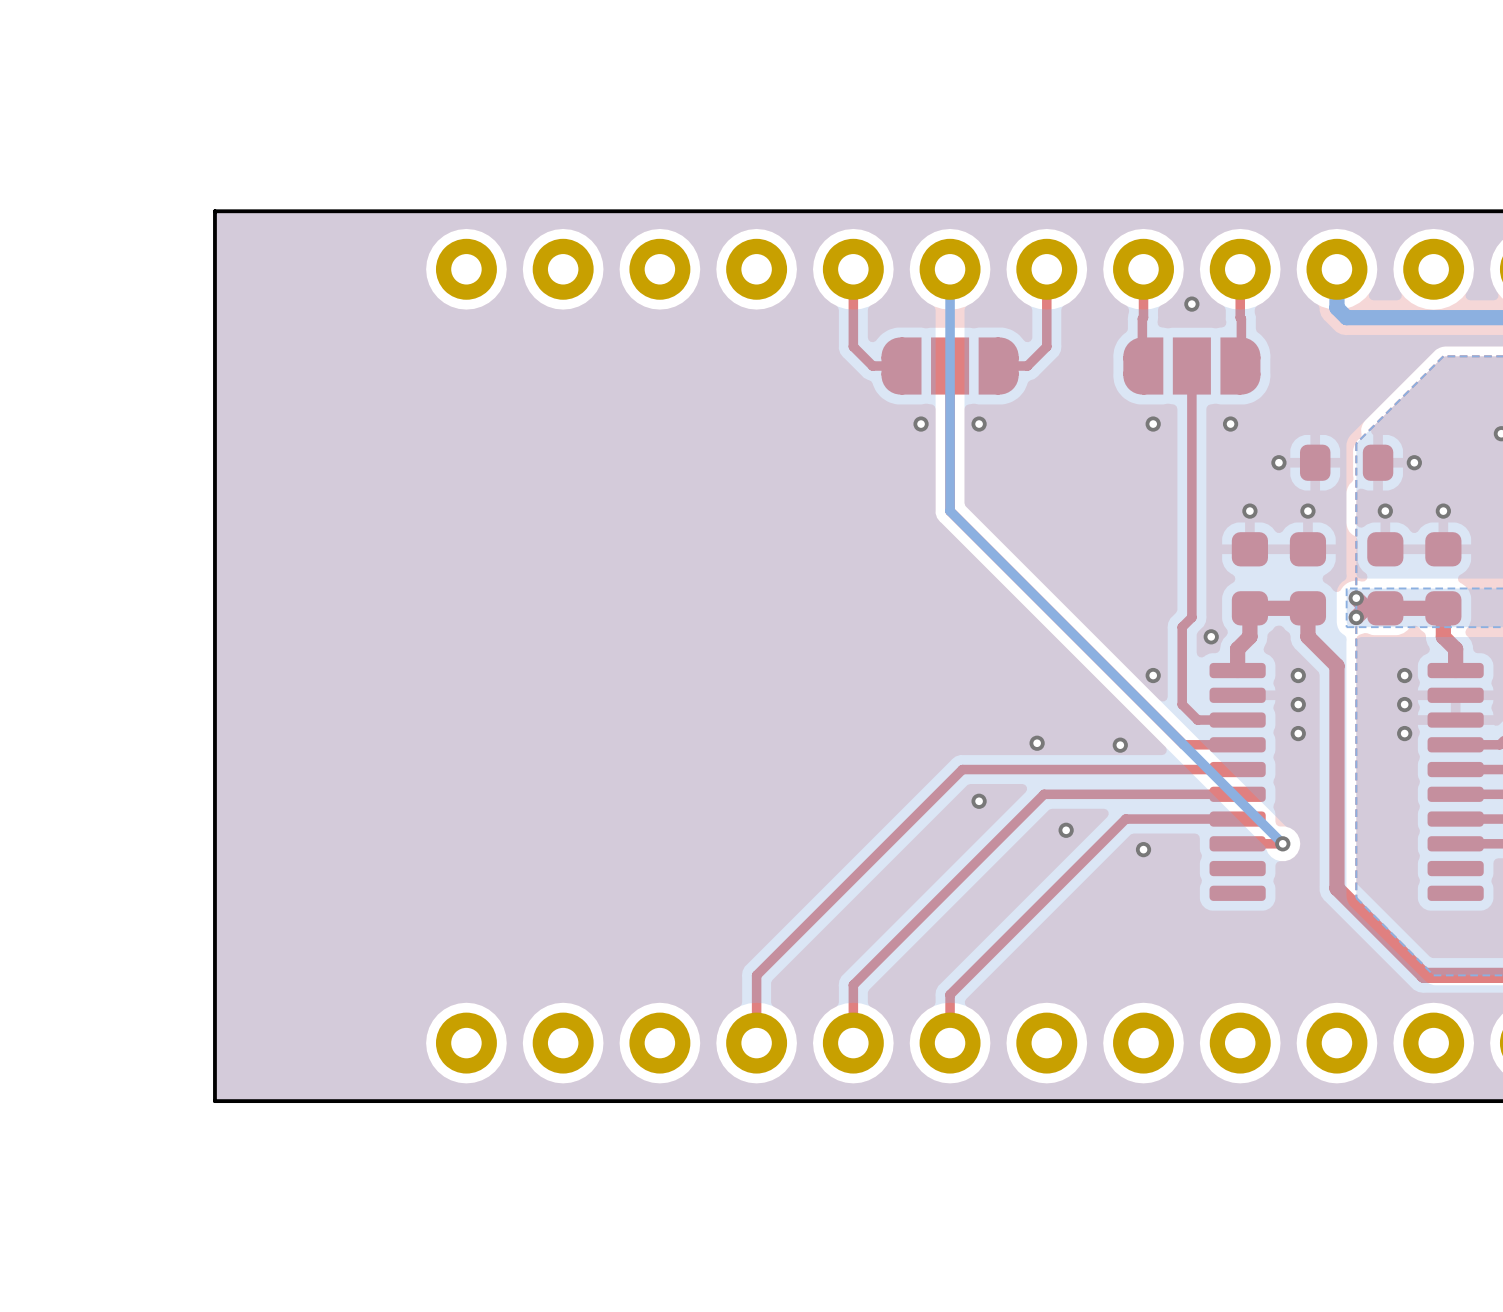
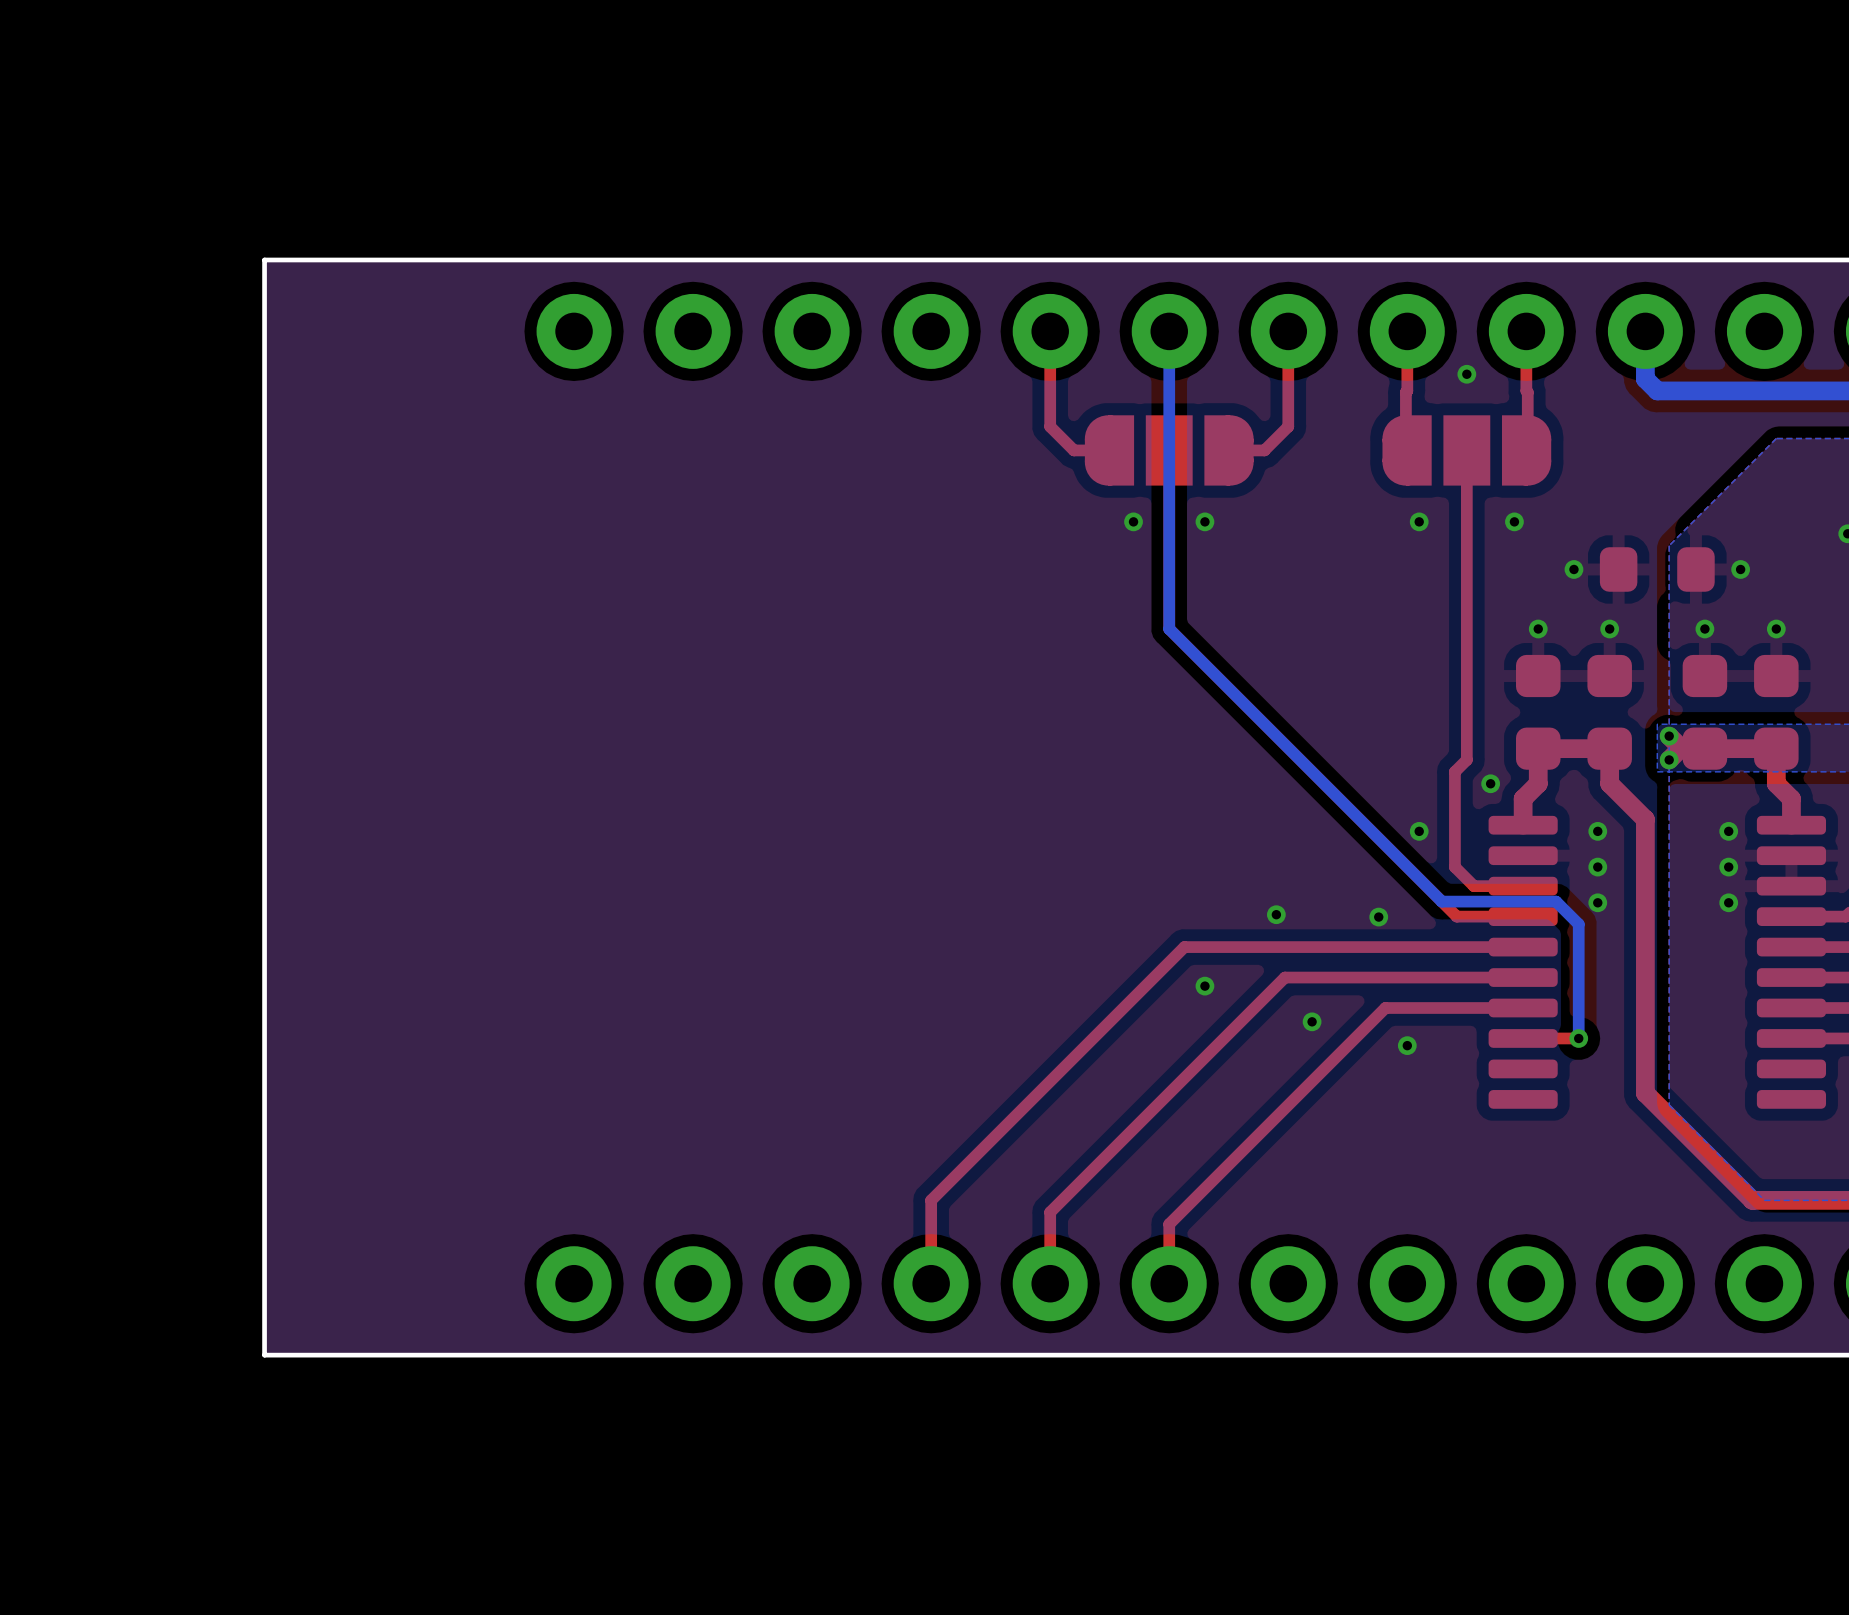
bottom track: (1171, 732) (1282, 843) -> (1441, 901) (1556, 901) (1578, 924) (1578, 1038)

